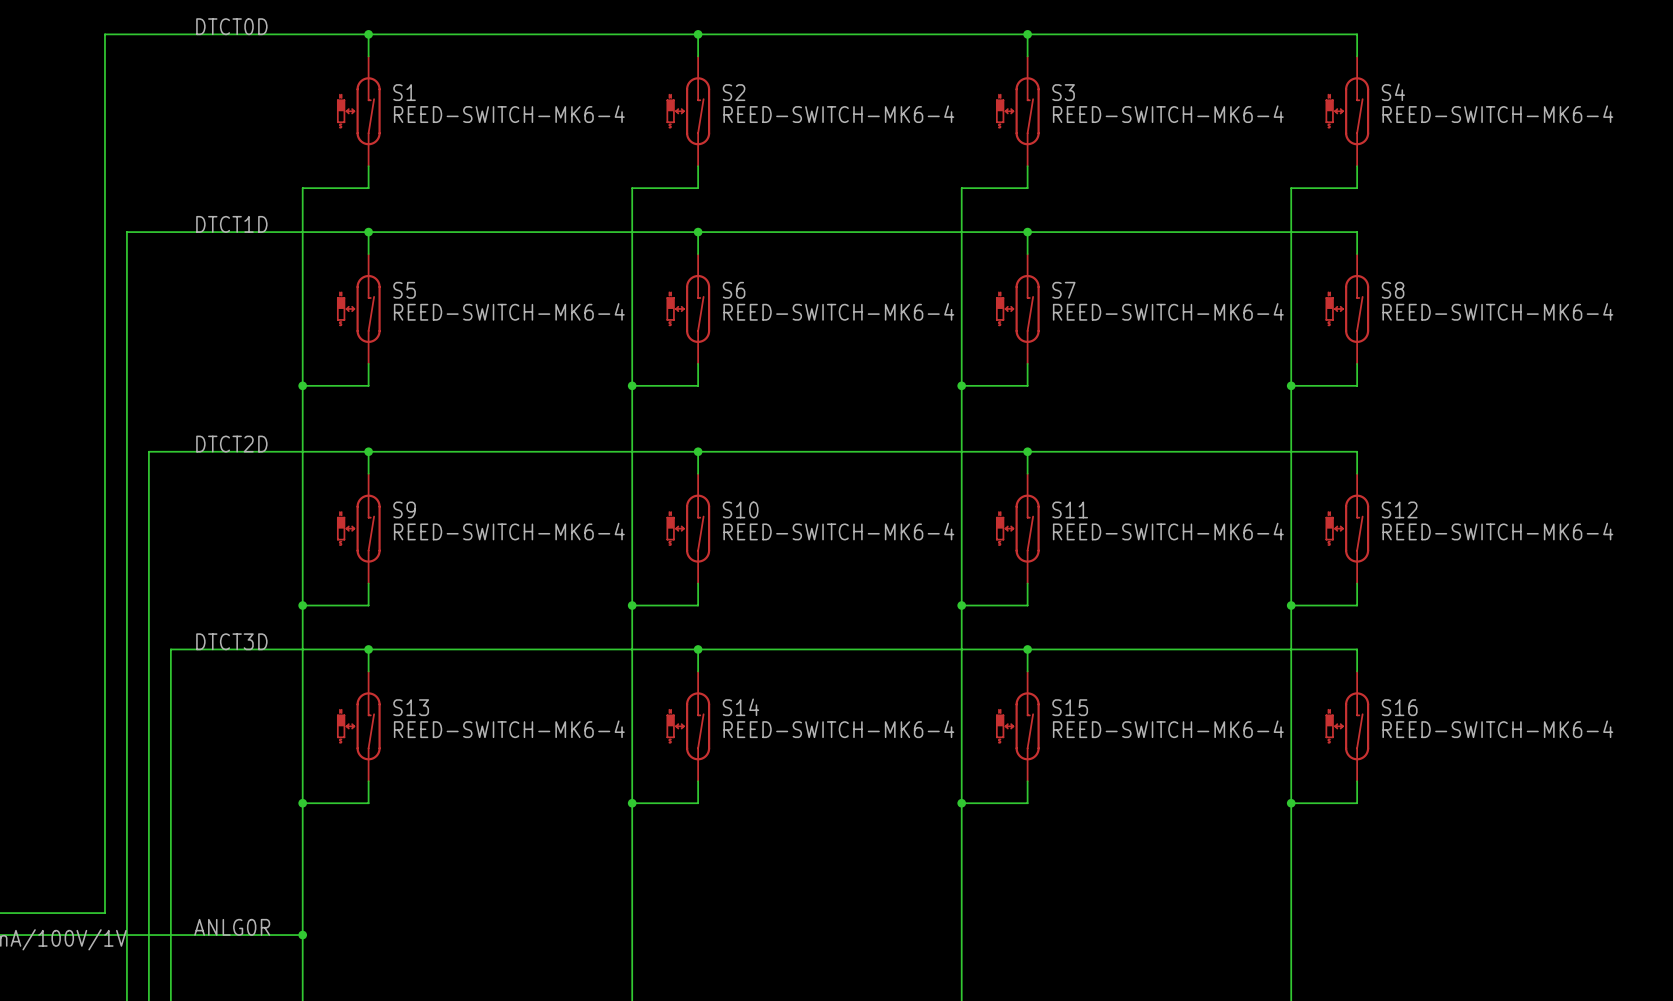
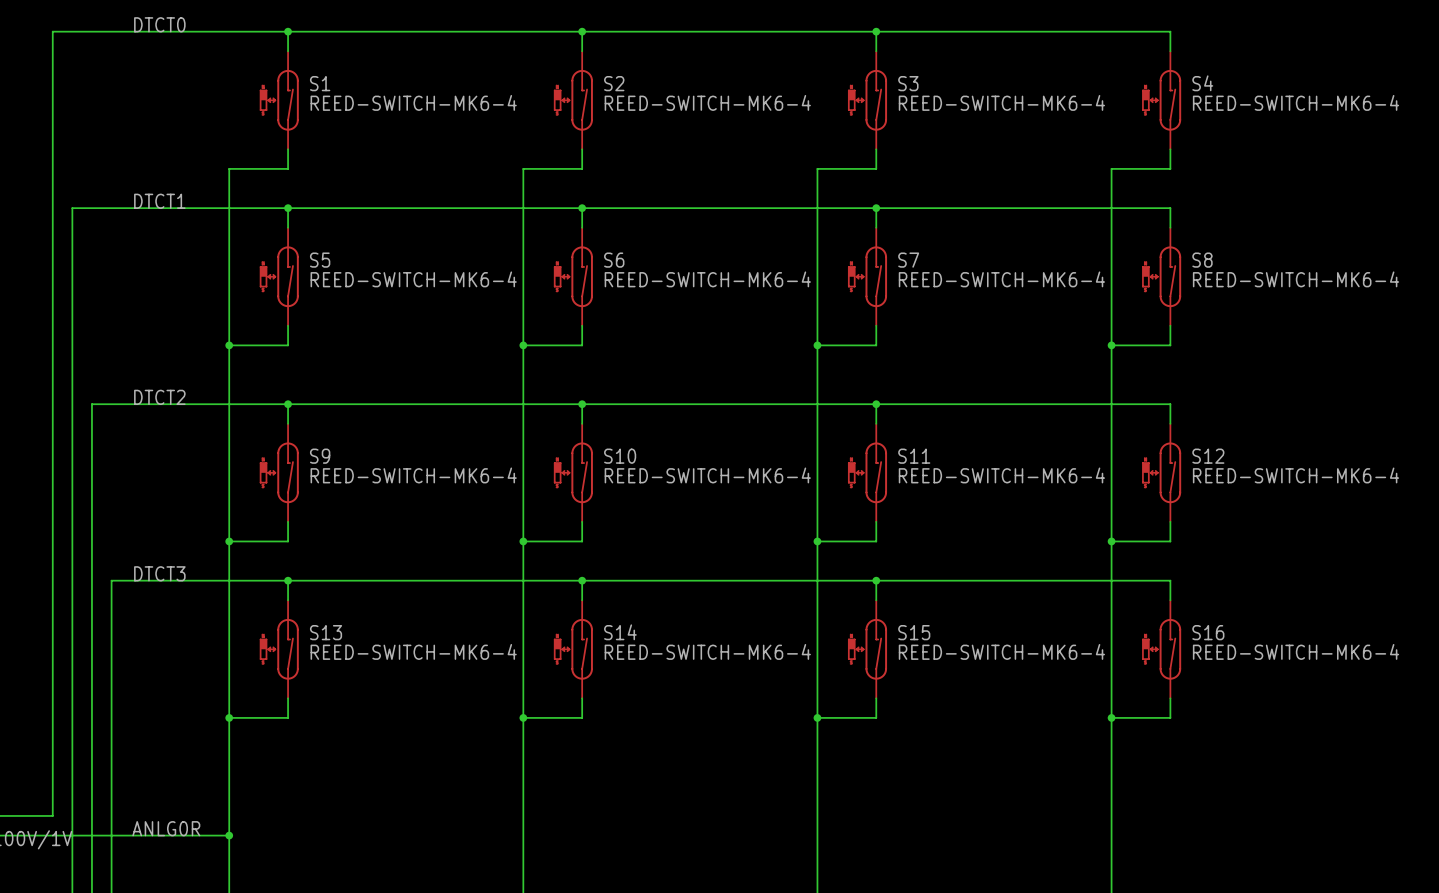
label: DTCT0D (231, 26) -> DTCT0 (159, 24)
label: DTCT1D (231, 224) -> DTCT1 (159, 201)
label: DTCT2D (231, 444) -> DTCT2 (159, 397)
label: DTCT3D (231, 641) -> DTCT3 (159, 573)

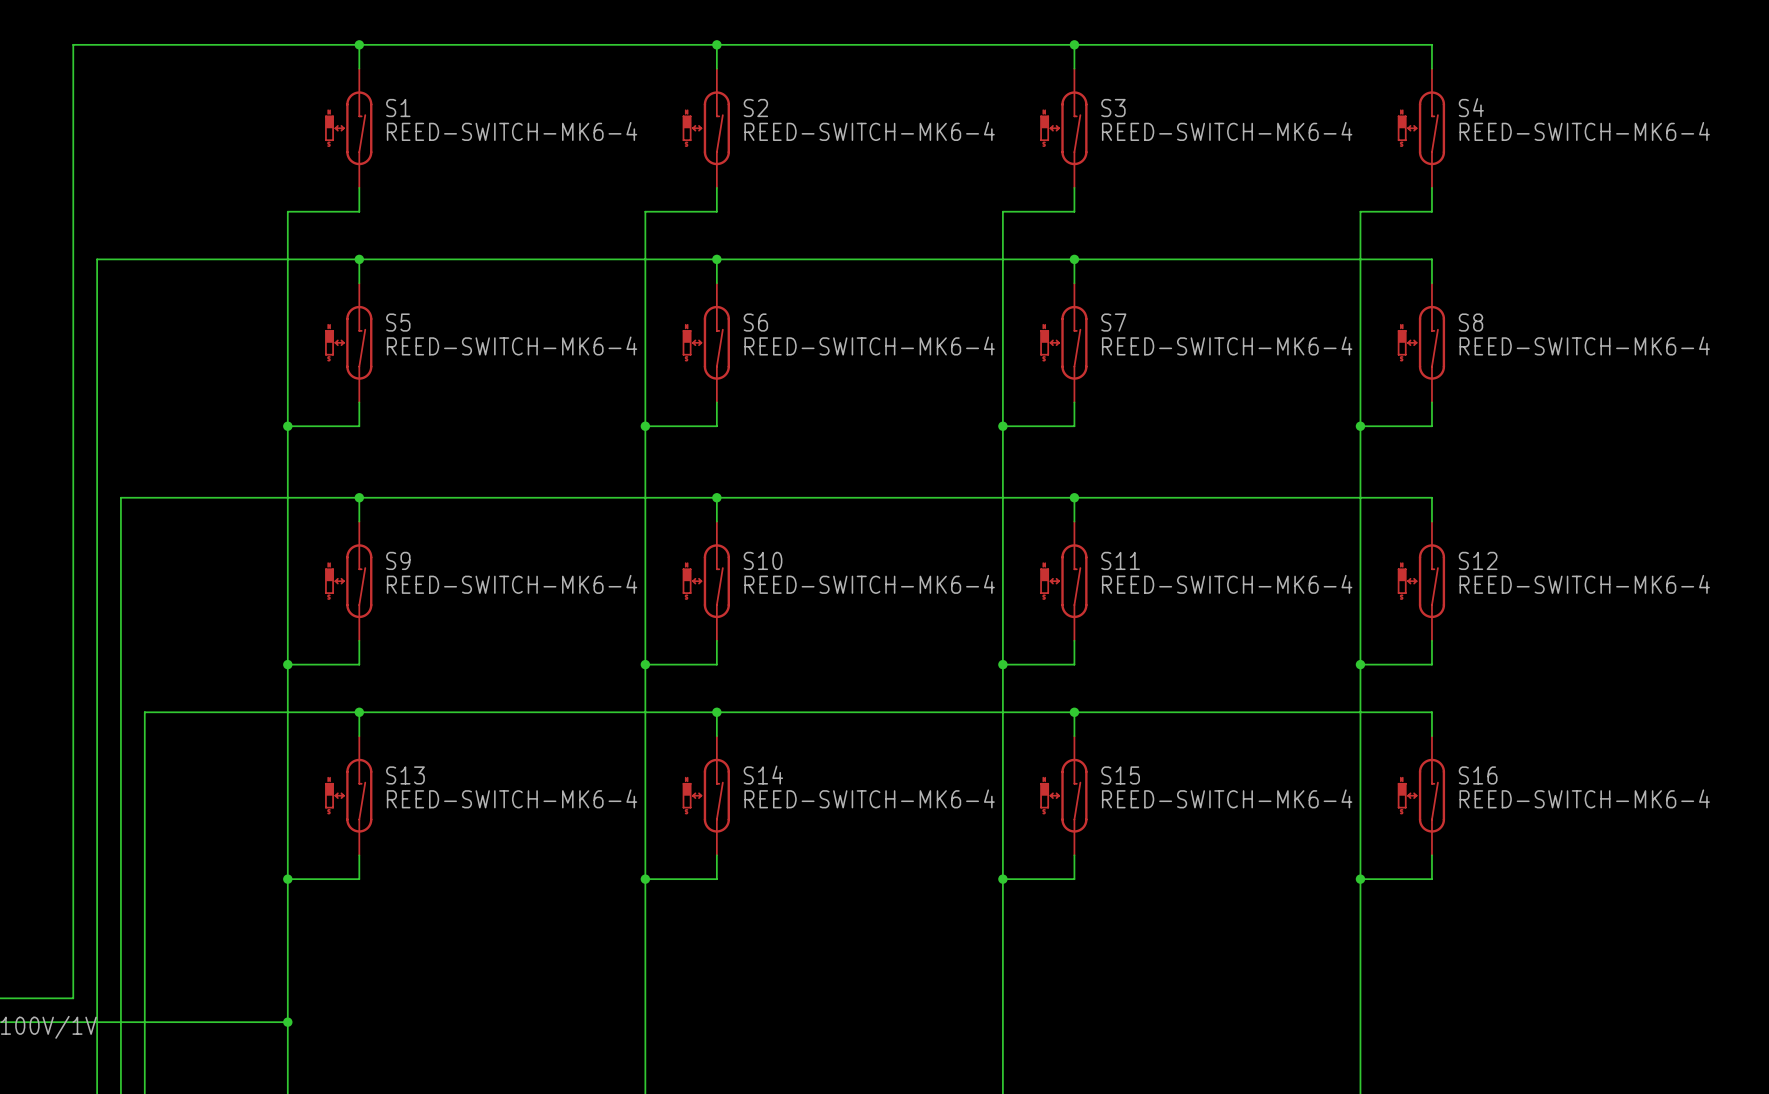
label: DTCT0 (159, 24) -> none
label: DTCT1 (159, 201) -> none
label: DTCT2 (159, 397) -> none
label: DTCT3 (159, 573) -> none
label: ANLG0R (166, 828) -> none

